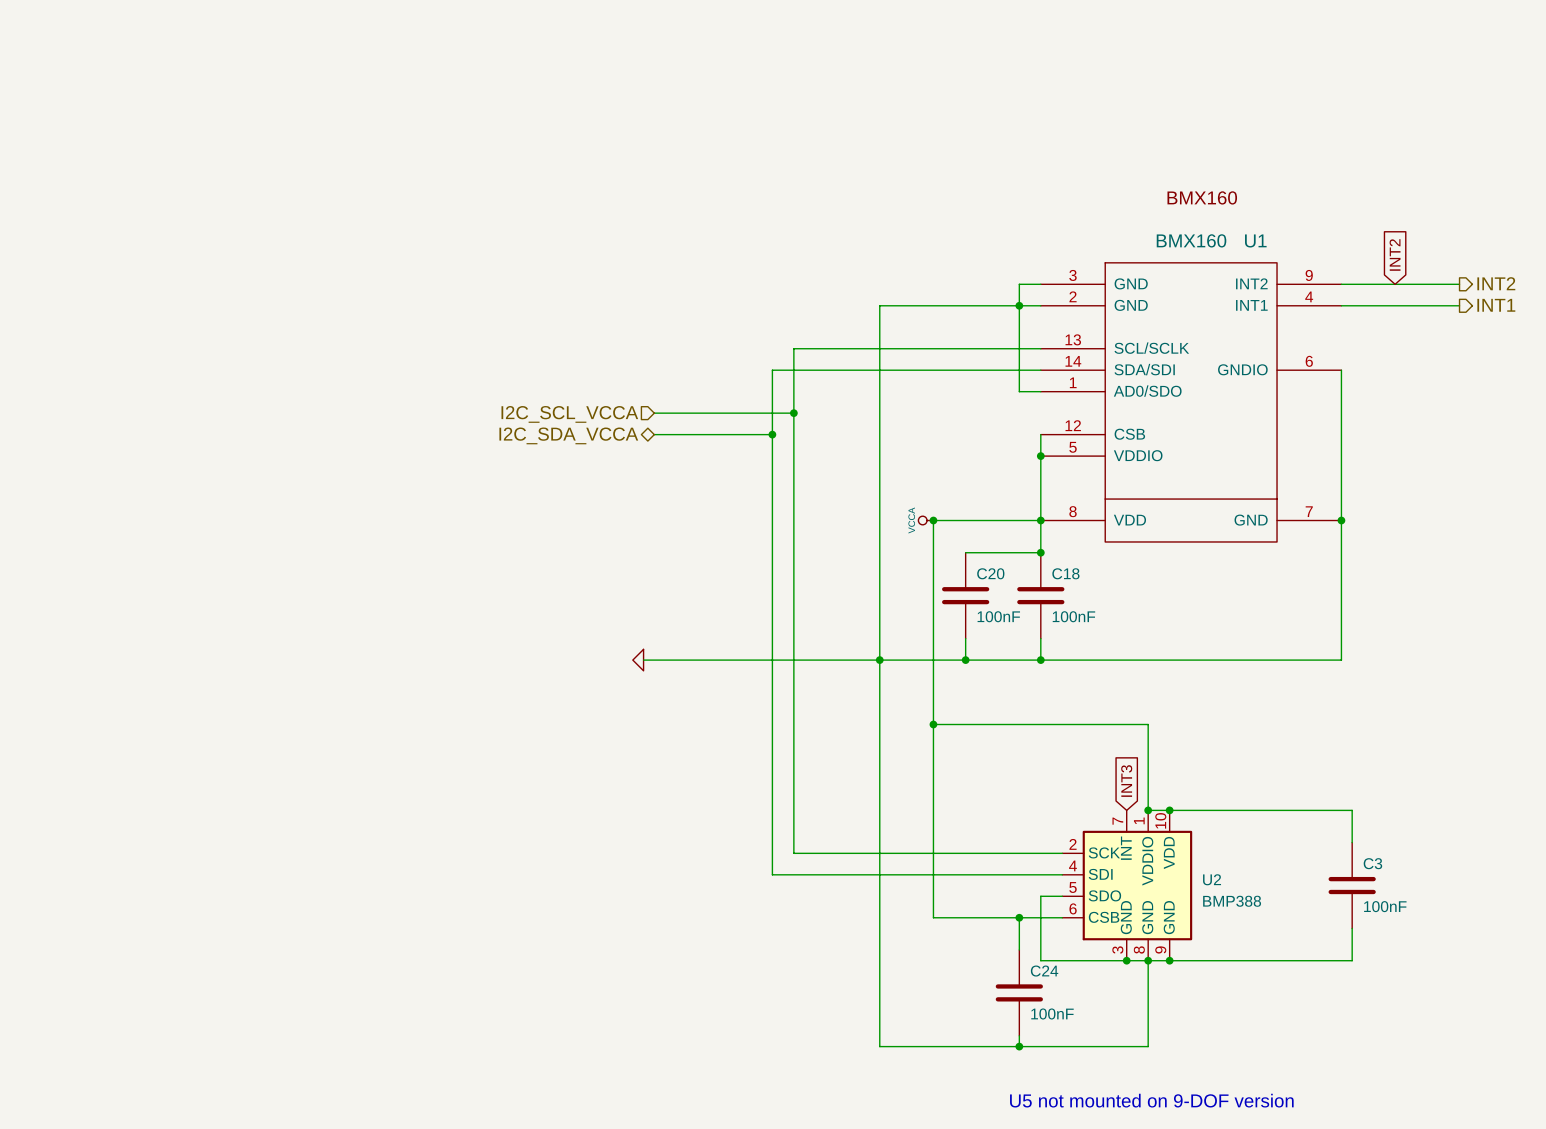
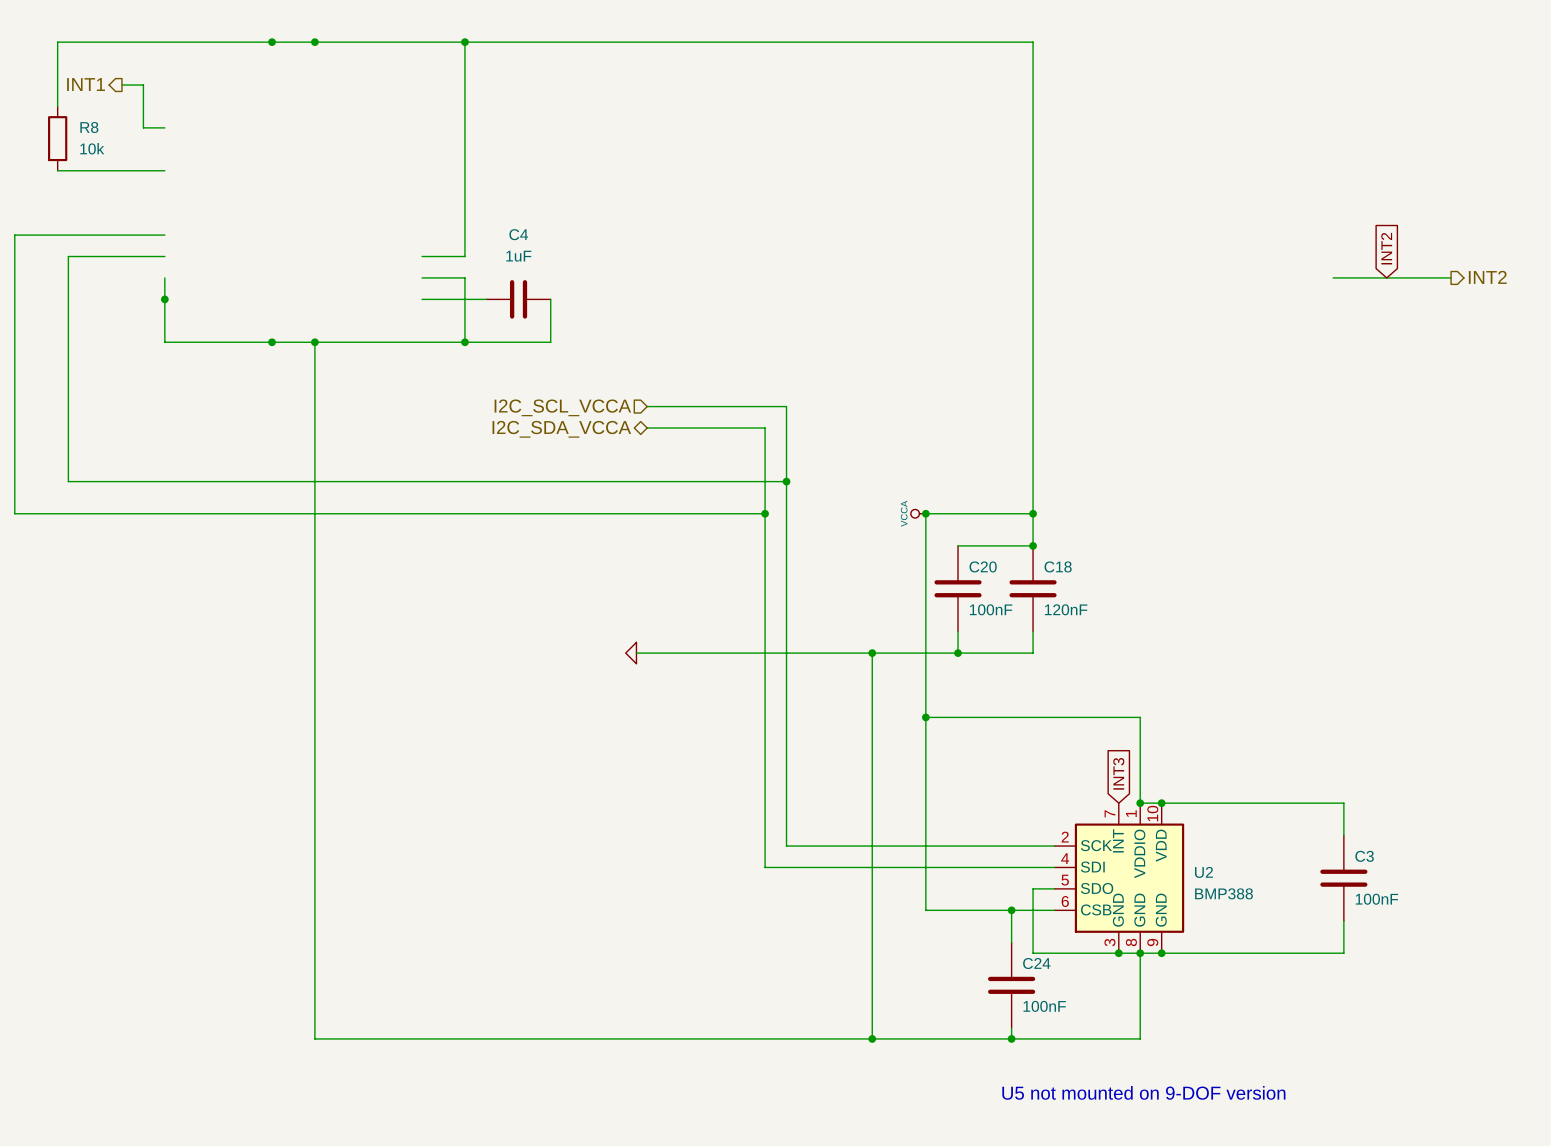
junction: none -> (272, 42)
junction: none -> (314, 42)
wire: none -> (464, 42) (464, 256) (422, 256)
junction: none -> (464, 42)
hierarchical label: none -> INT1 (86, 84)
wire: none -> (121, 85) (143, 85) (143, 127) (164, 127)
wire: none -> (57, 106) (57, 42) (1033, 42) (1033, 428)
R8: none -> 10k (57, 138)
wire: none -> (57, 170) (164, 170)
wire: none -> (164, 235) (14, 235) (14, 513) (765, 513)
wire: none -> (164, 256) (68, 256) (68, 481) (786, 481)
wire: none -> (164, 277) (164, 342) (550, 342) (550, 299)
wire: none -> (422, 277) (464, 277) (464, 342)
wire: (1040, 284) (1019, 284) (1019, 391) (1040, 391) -> none
junction: none -> (164, 299)
wire: none -> (422, 299) (486, 299)
C4: none -> 1uF (518, 299)
junction: (1019, 305) -> none
wire: (1040, 305) (879, 305) (879, 660) -> none
wire: (1341, 305) (1459, 305) -> none
hierarchical label: INT1 (1496, 305) -> none
junction: none -> (272, 342)
wire: none -> (314, 342) (314, 1038) (872, 1038)
junction: none -> (314, 342)
junction: none -> (464, 342)
wire: (1040, 348) (793, 348) (793, 413) -> none
wire: (1040, 370) (772, 370) (772, 434) -> none
wire: (1341, 370) (1341, 660) (1040, 660) -> none
U1: BMX160 (1191, 402) -> none
junction: (793, 413) -> none
junction: (772, 434) -> none
junction: (1040, 456) -> none
junction: none -> (786, 481)
junction: none -> (765, 513)
junction: (1341, 520) -> none
C18 value: 100nF (1073, 616) -> 120nF (1066, 609)
junction: (1040, 660) -> none
junction: none -> (872, 1038)

